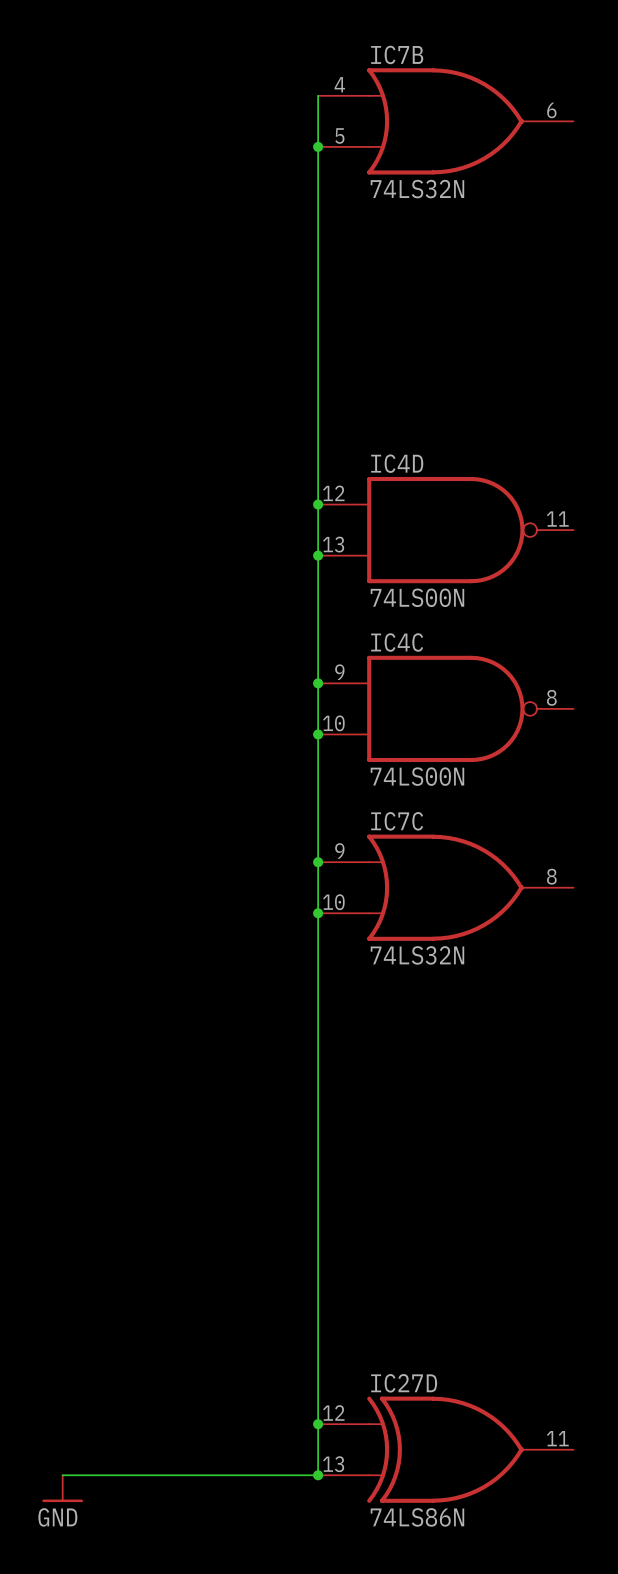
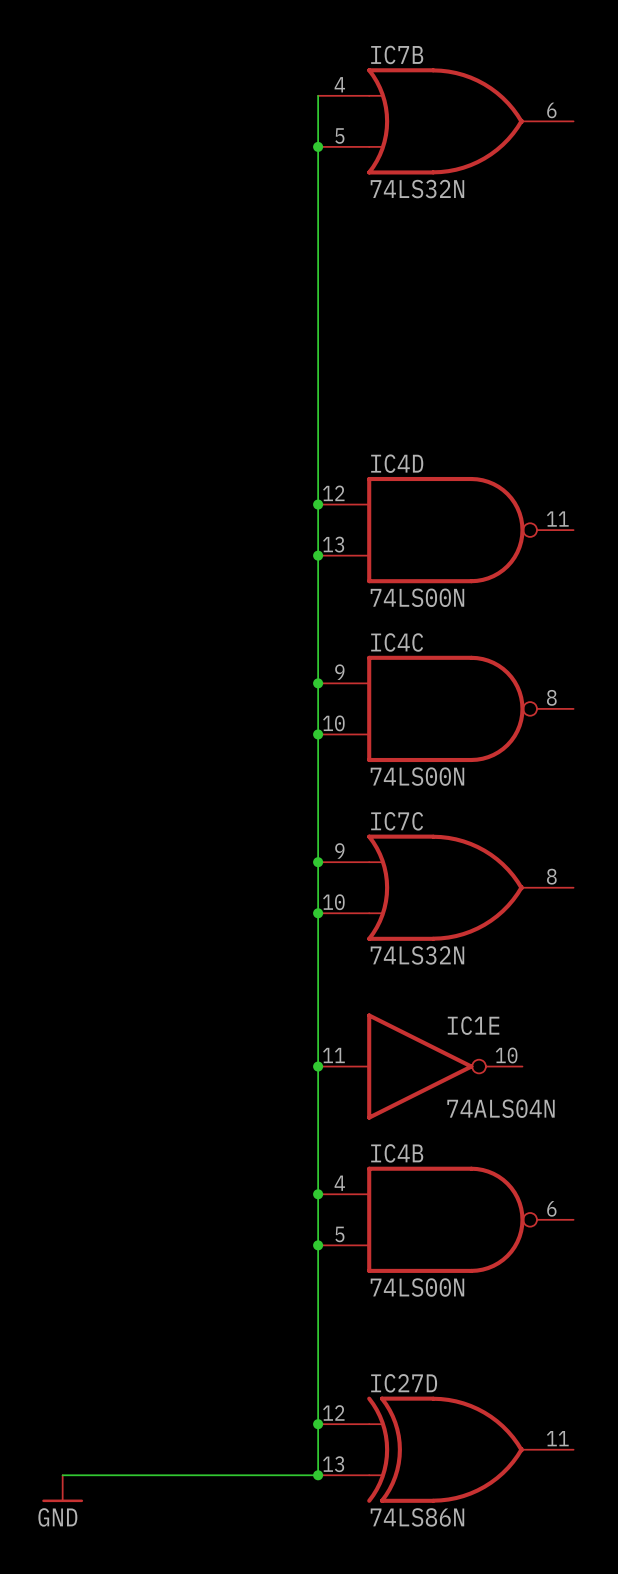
junction: none -> (318, 1066)
IC1E: none -> 74ALS04N (420, 1066)
junction: none -> (318, 1194)
IC4B: none -> 74LS00N (445, 1219)
junction: none -> (318, 1245)

